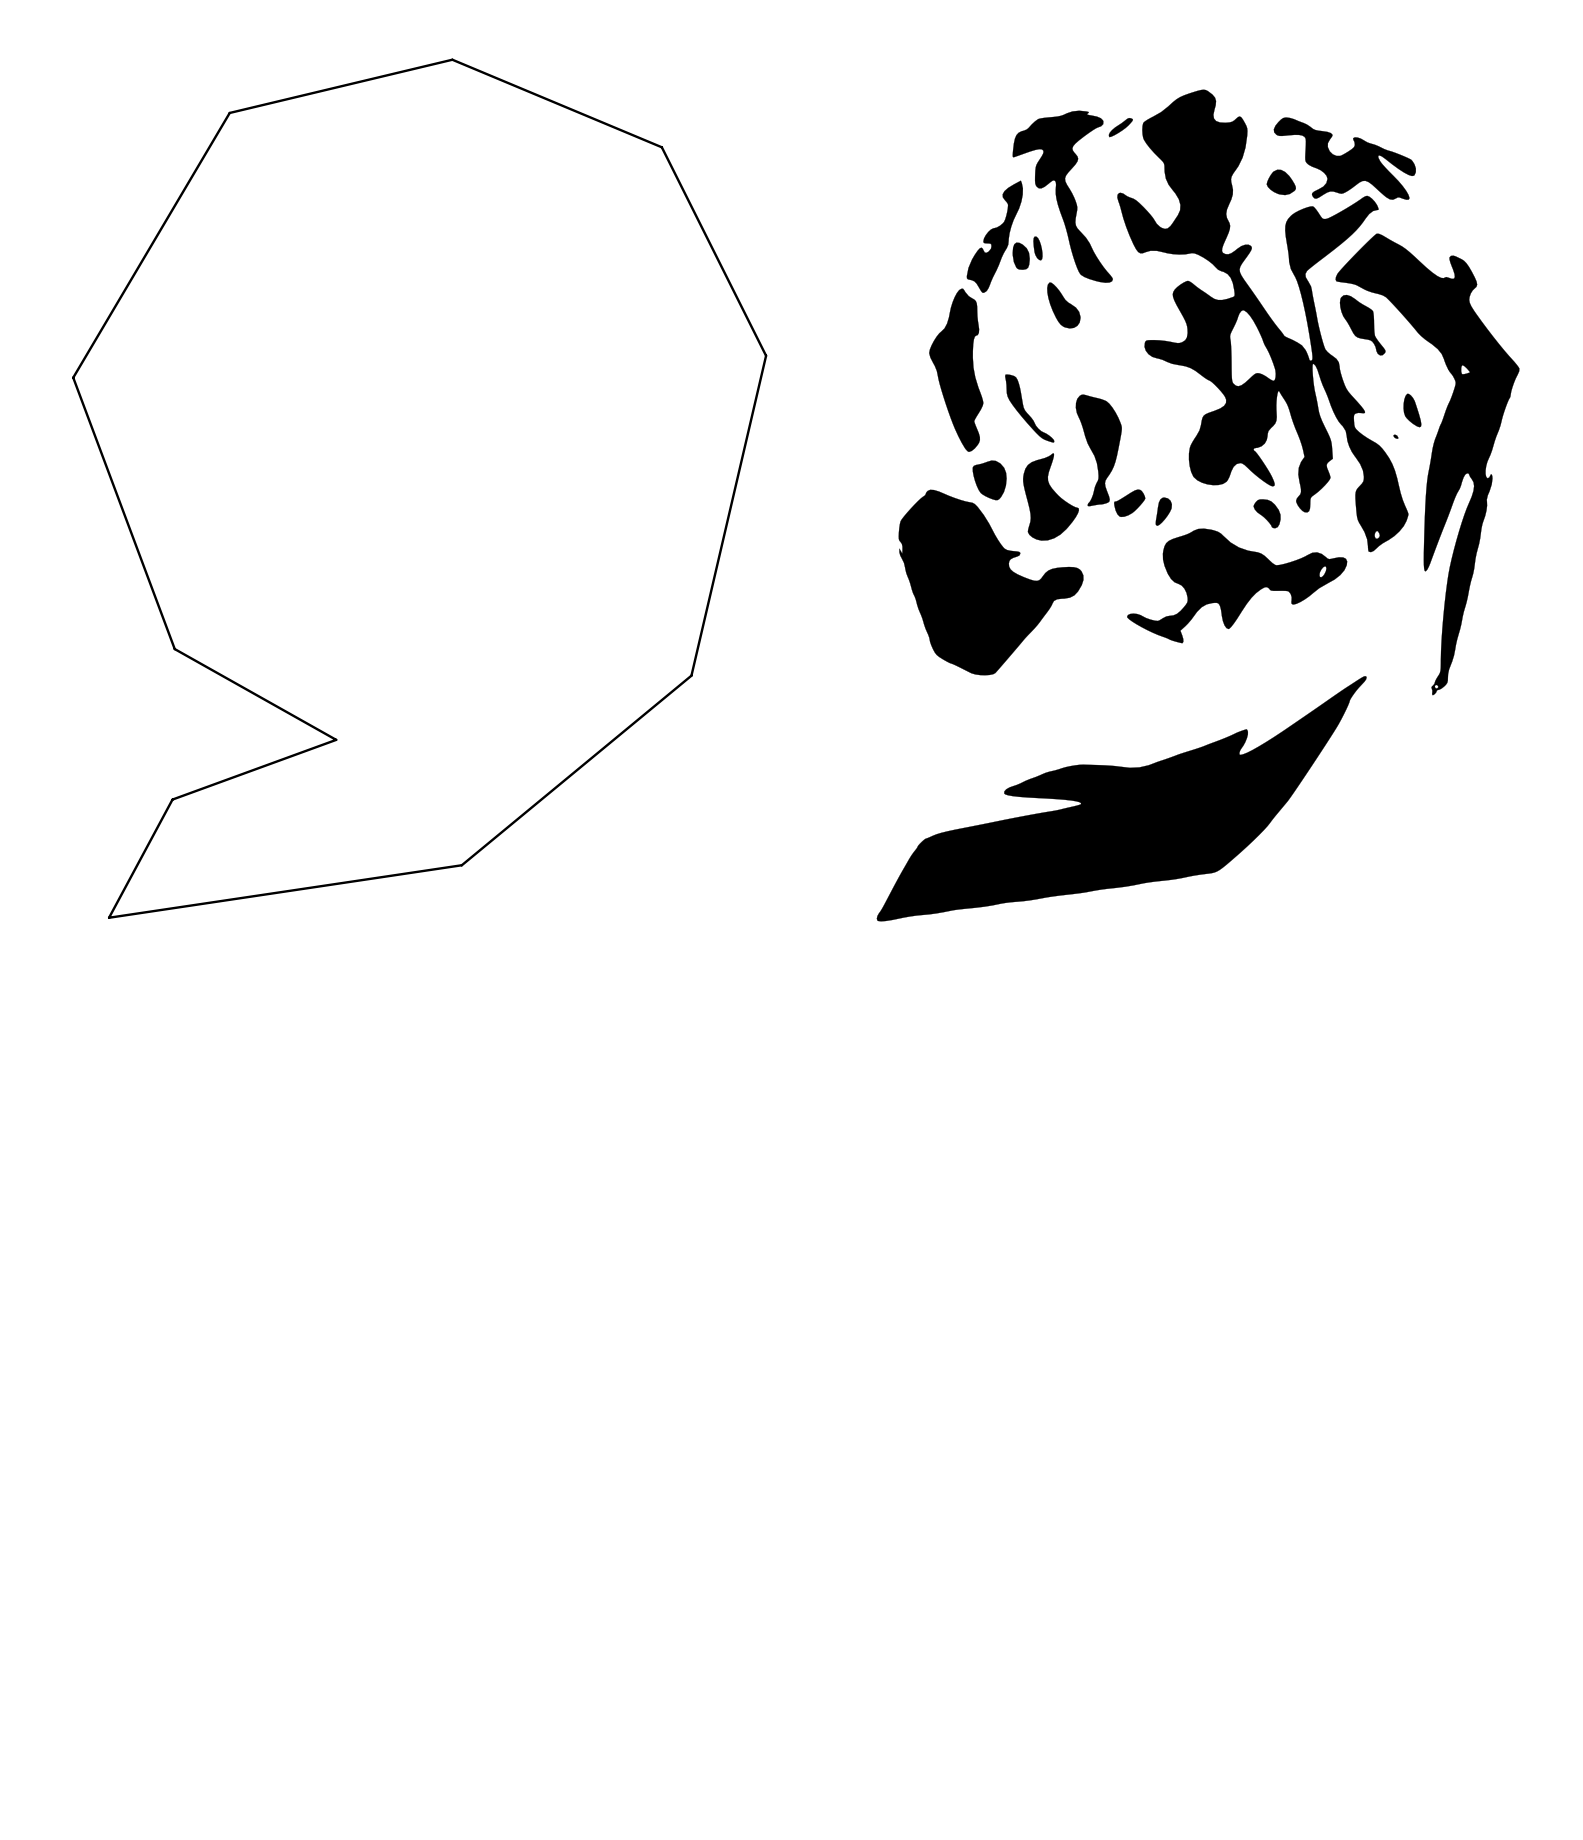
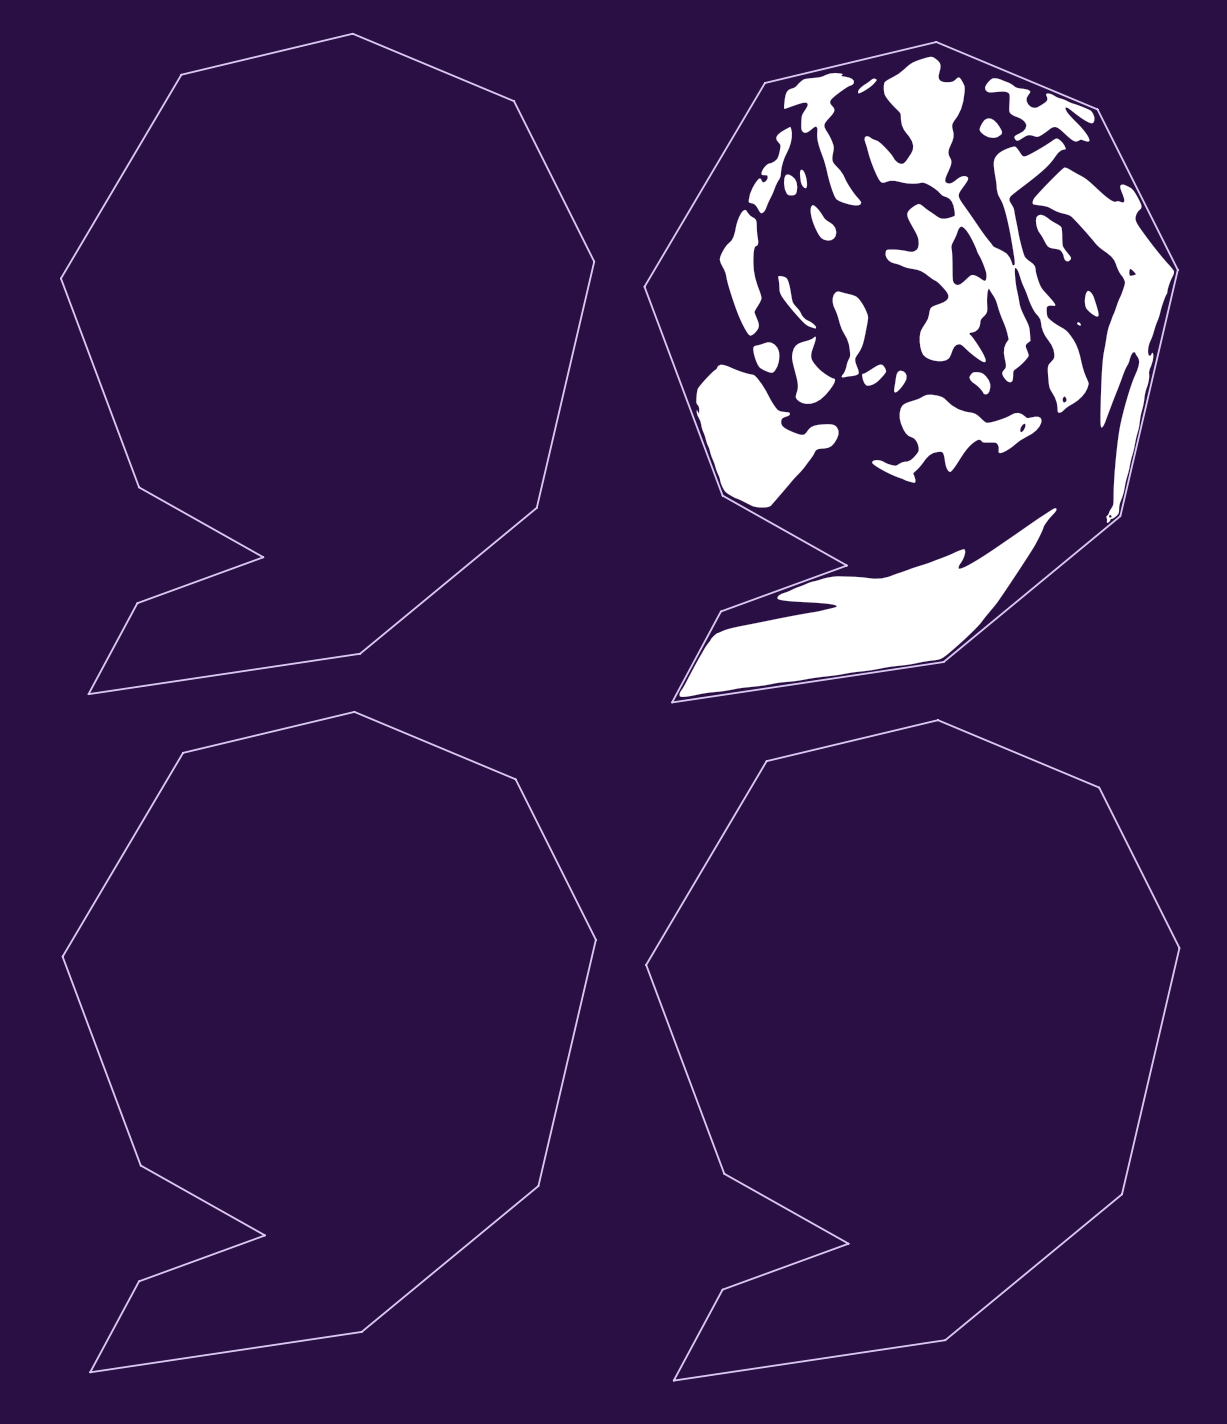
board edge: none -> (936, 42) (764, 83) (644, 286) (722, 495) (846, 565) (720, 611) (672, 702) (943, 662) (1120, 516) (1177, 269) (1097, 109) (936, 42)
board edge: none -> (354, 711) (183, 752) (62, 956) (140, 1165) (265, 1235) (139, 1281) (90, 1372) (361, 1331) (538, 1186) (595, 939) (515, 779) (354, 711)
board edge: none -> (937, 720) (1099, 787) (1179, 948) (1122, 1194) (945, 1340) (673, 1380) (722, 1289) (848, 1243) (724, 1173) (646, 964) (766, 761) (937, 720)

